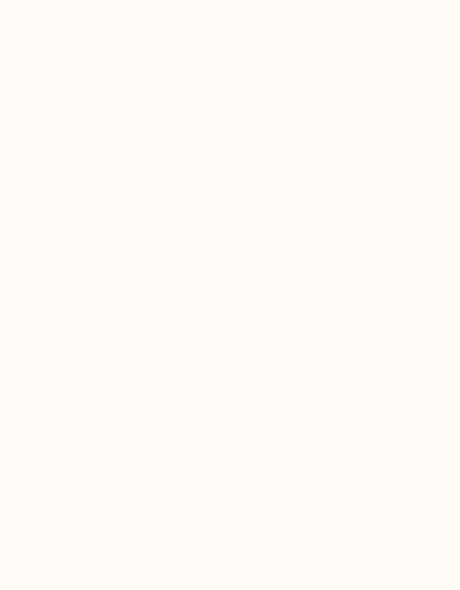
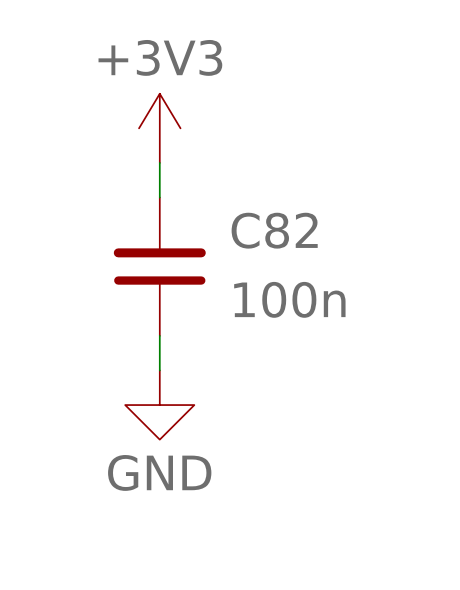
power symbol: none -> +3V3 (159, 128)
wire: none -> (159, 162) (159, 197)
C82: none -> (159, 266)
wire: none -> (159, 335) (159, 370)
power symbol: none -> GND (159, 405)

